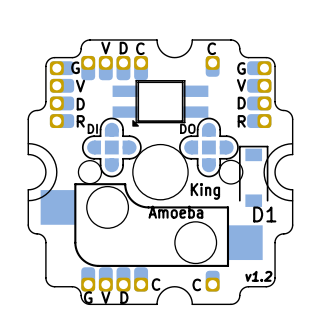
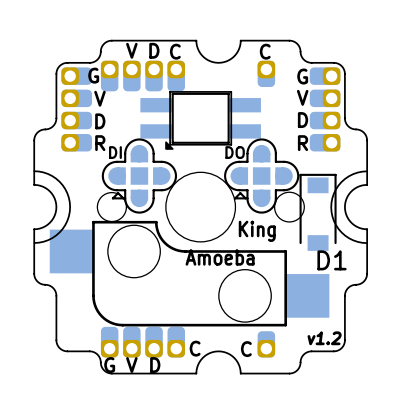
part footprint: [81, 117, 142, 178] -> [101, 138, 178, 214]
part footprint: [179, 117, 239, 178] -> [224, 138, 300, 214]

